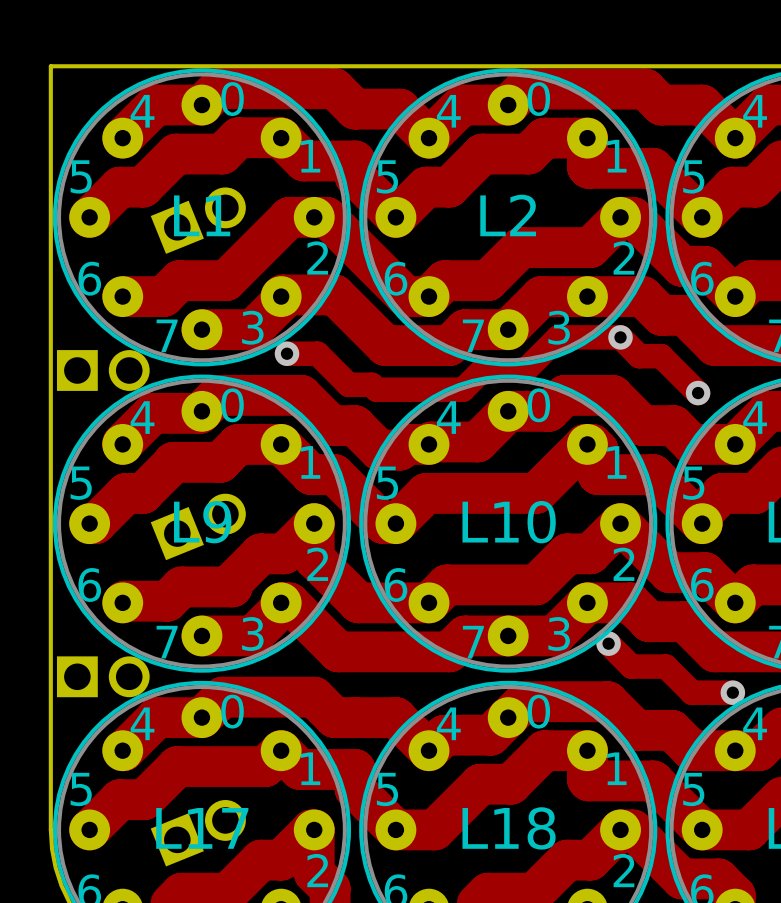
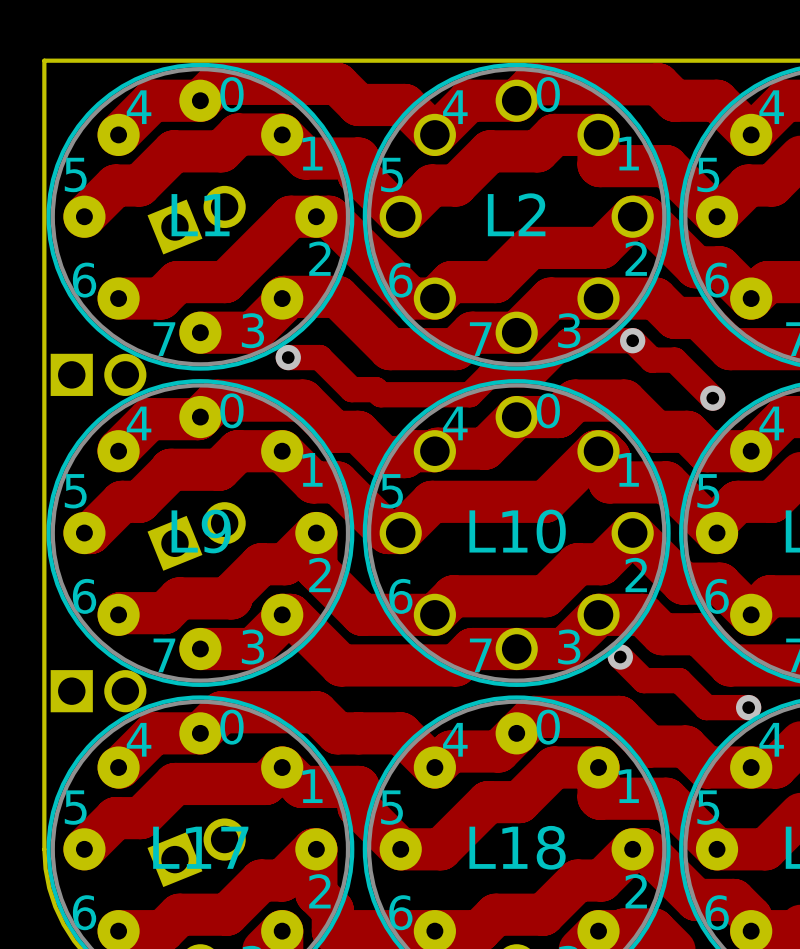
L2 footprint: [359, 68, 658, 367] -> [362, 62, 671, 371]
L10 footprint: [359, 374, 658, 673] -> [362, 379, 671, 687]

